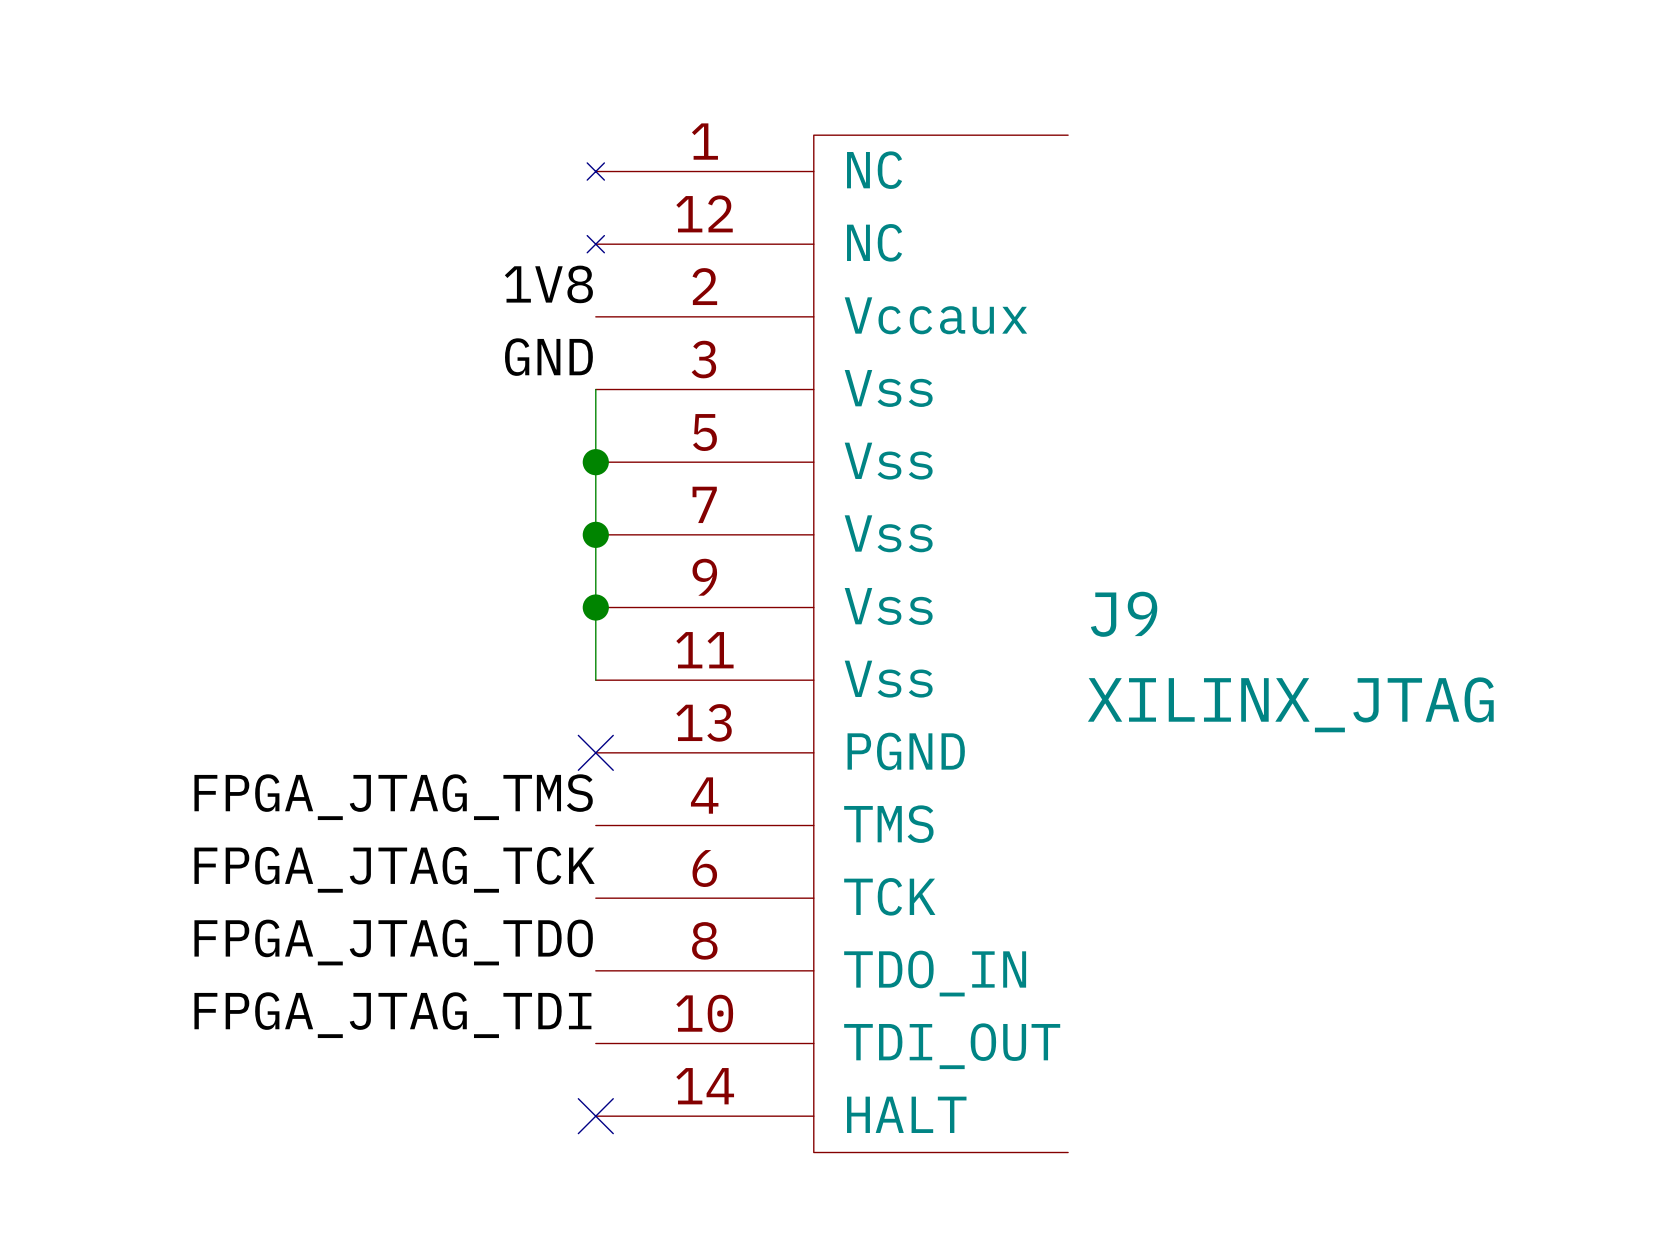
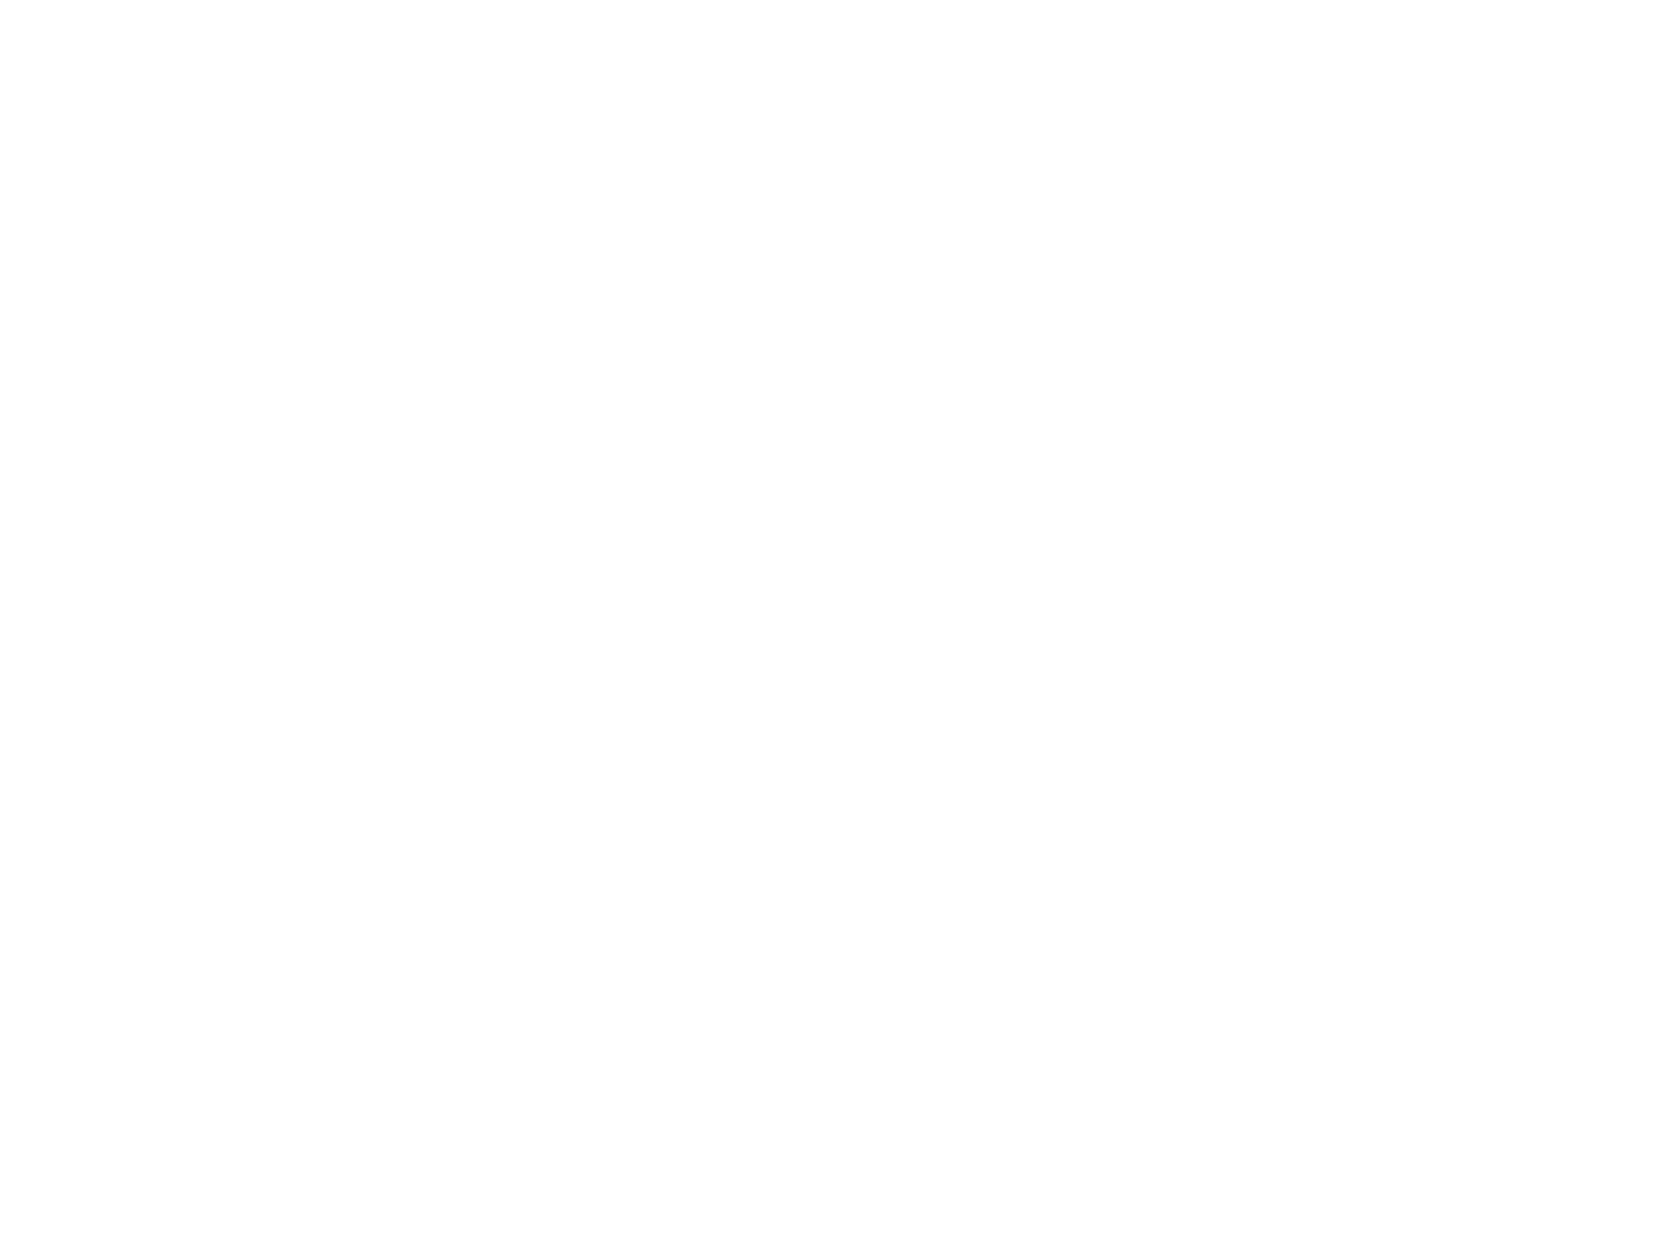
label: 1V8 (548, 284) -> none
label: GND (548, 357) -> none
wire: (595, 389) (595, 680) -> none
junction: (595, 462) -> none
junction: (595, 534) -> none
junction: (595, 607) -> none
J9: XILINX_JTAG (827, 643) -> none
no-connect mark: (595, 752) -> none
label: FPGA_JTAG_TMS (393, 797) -> none
label: FPGA_JTAG_TCK (394, 869) -> none
label: FPGA_JTAG_TDO (393, 942) -> none
label: FPGA_JTAG_TDI (392, 1015) -> none
no-connect mark: (595, 1116) -> none

